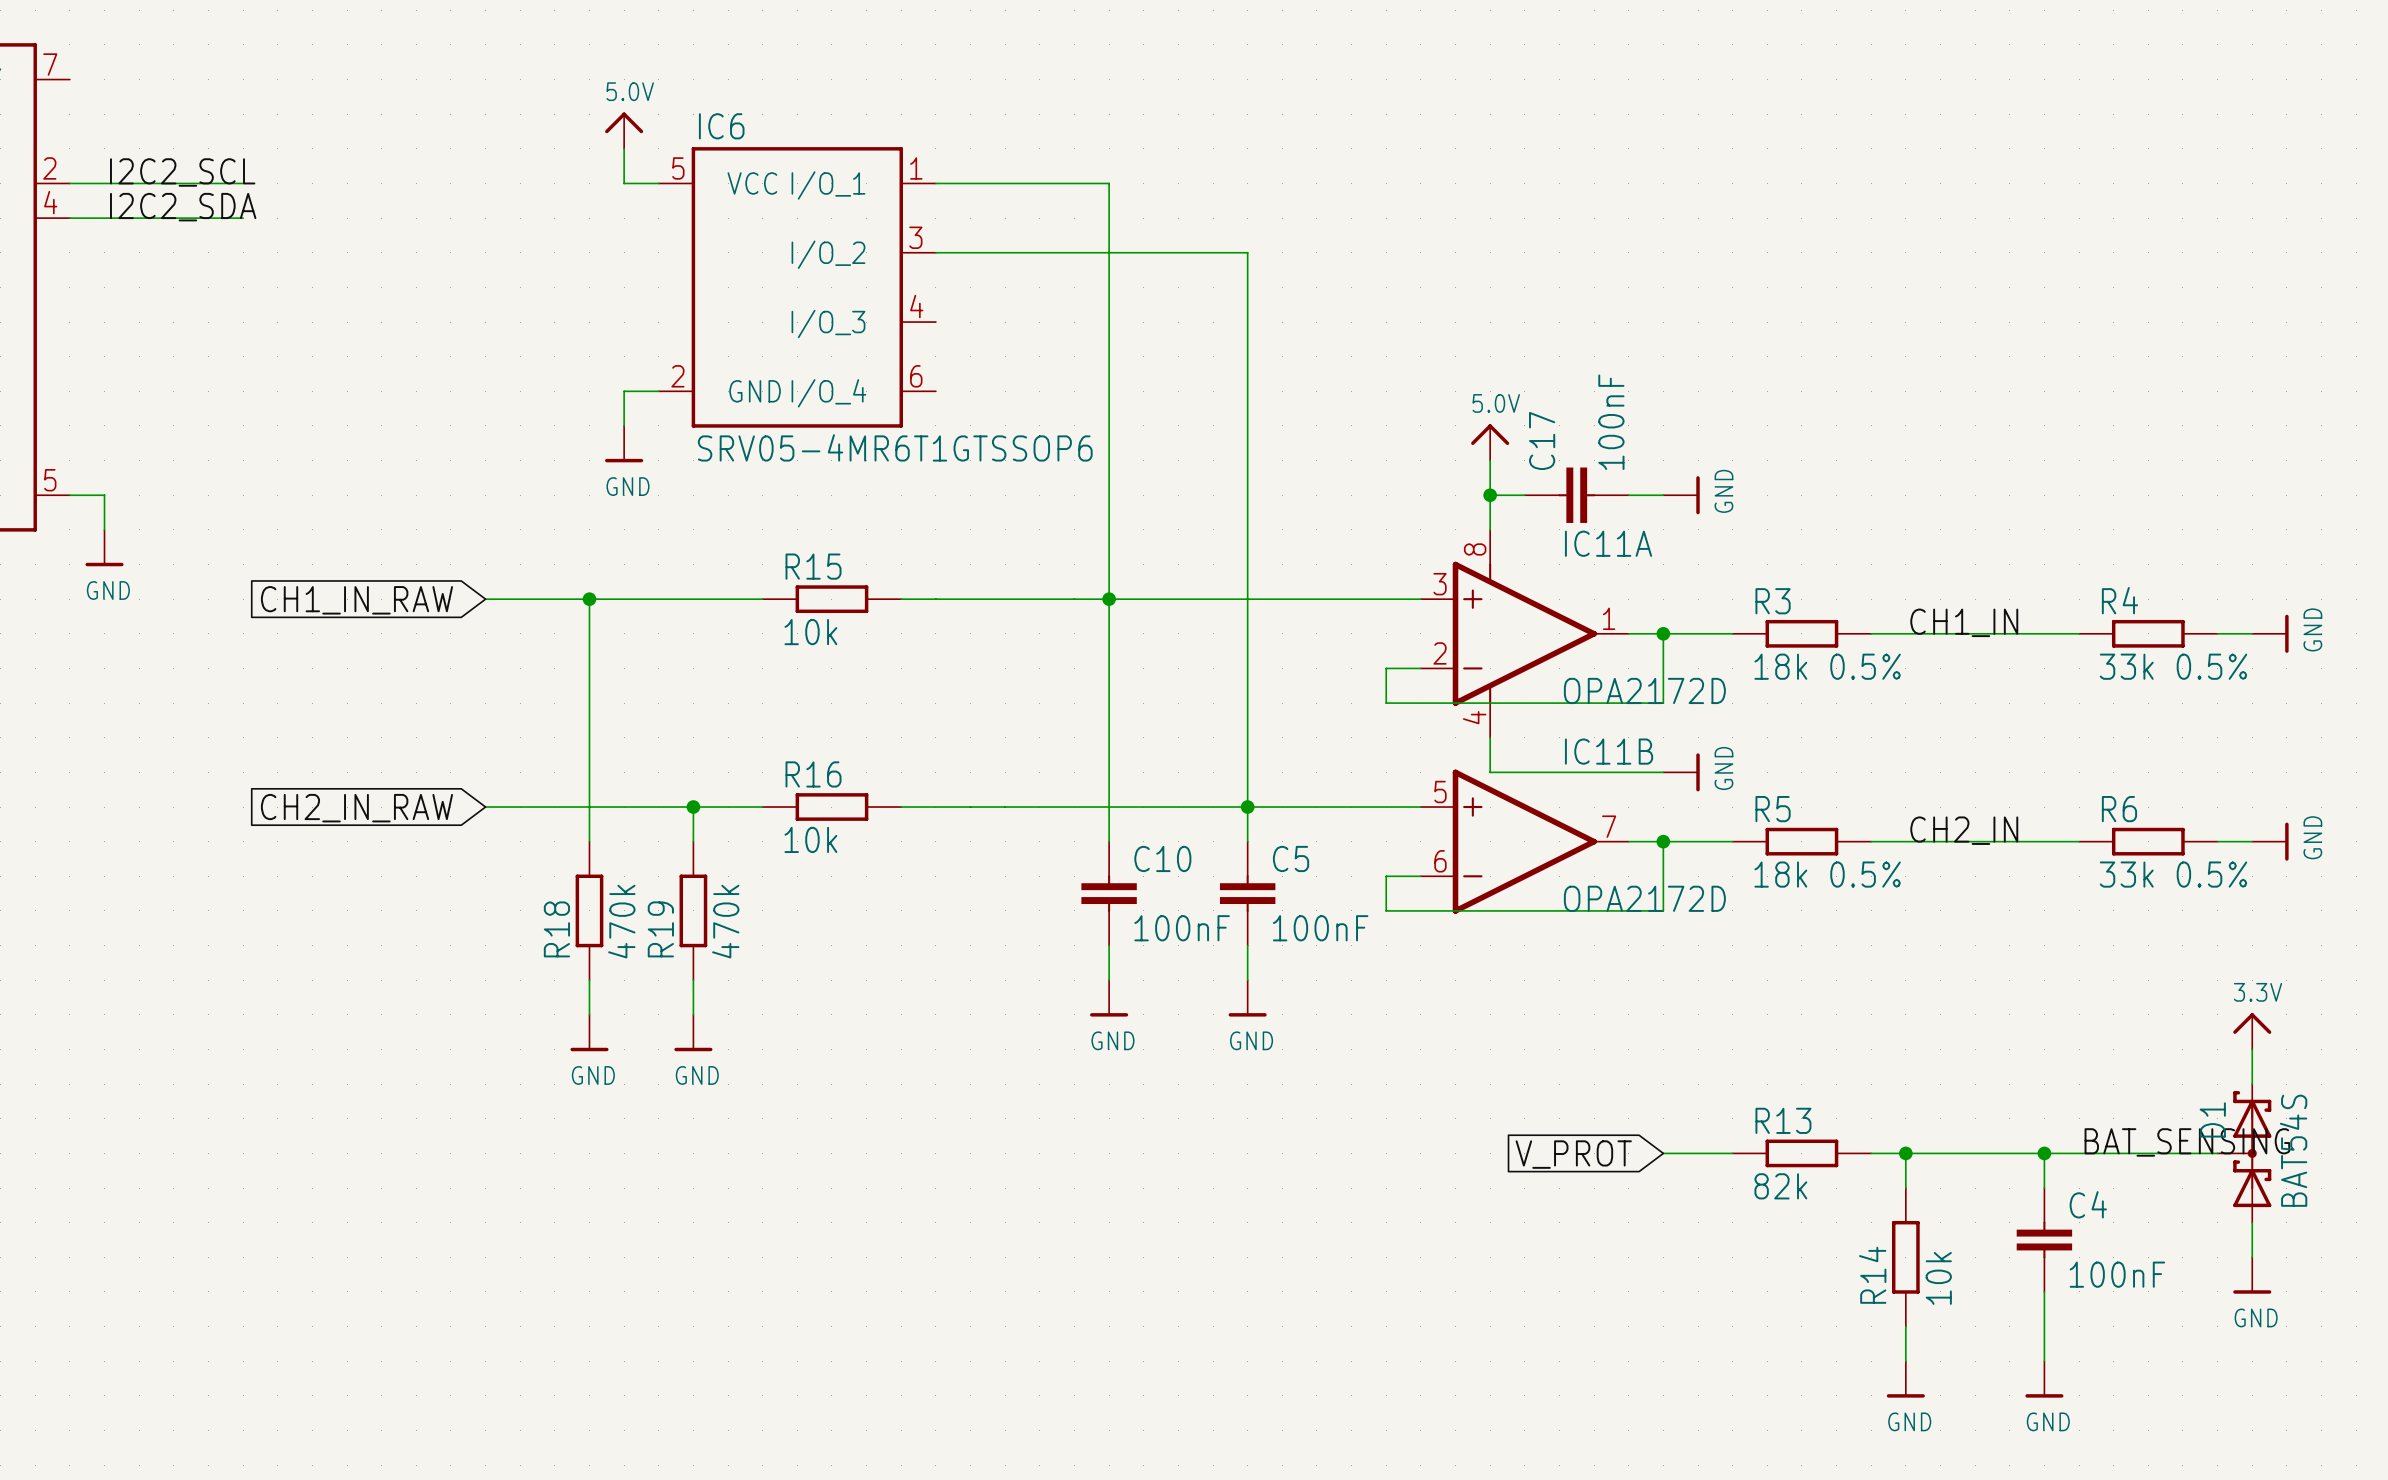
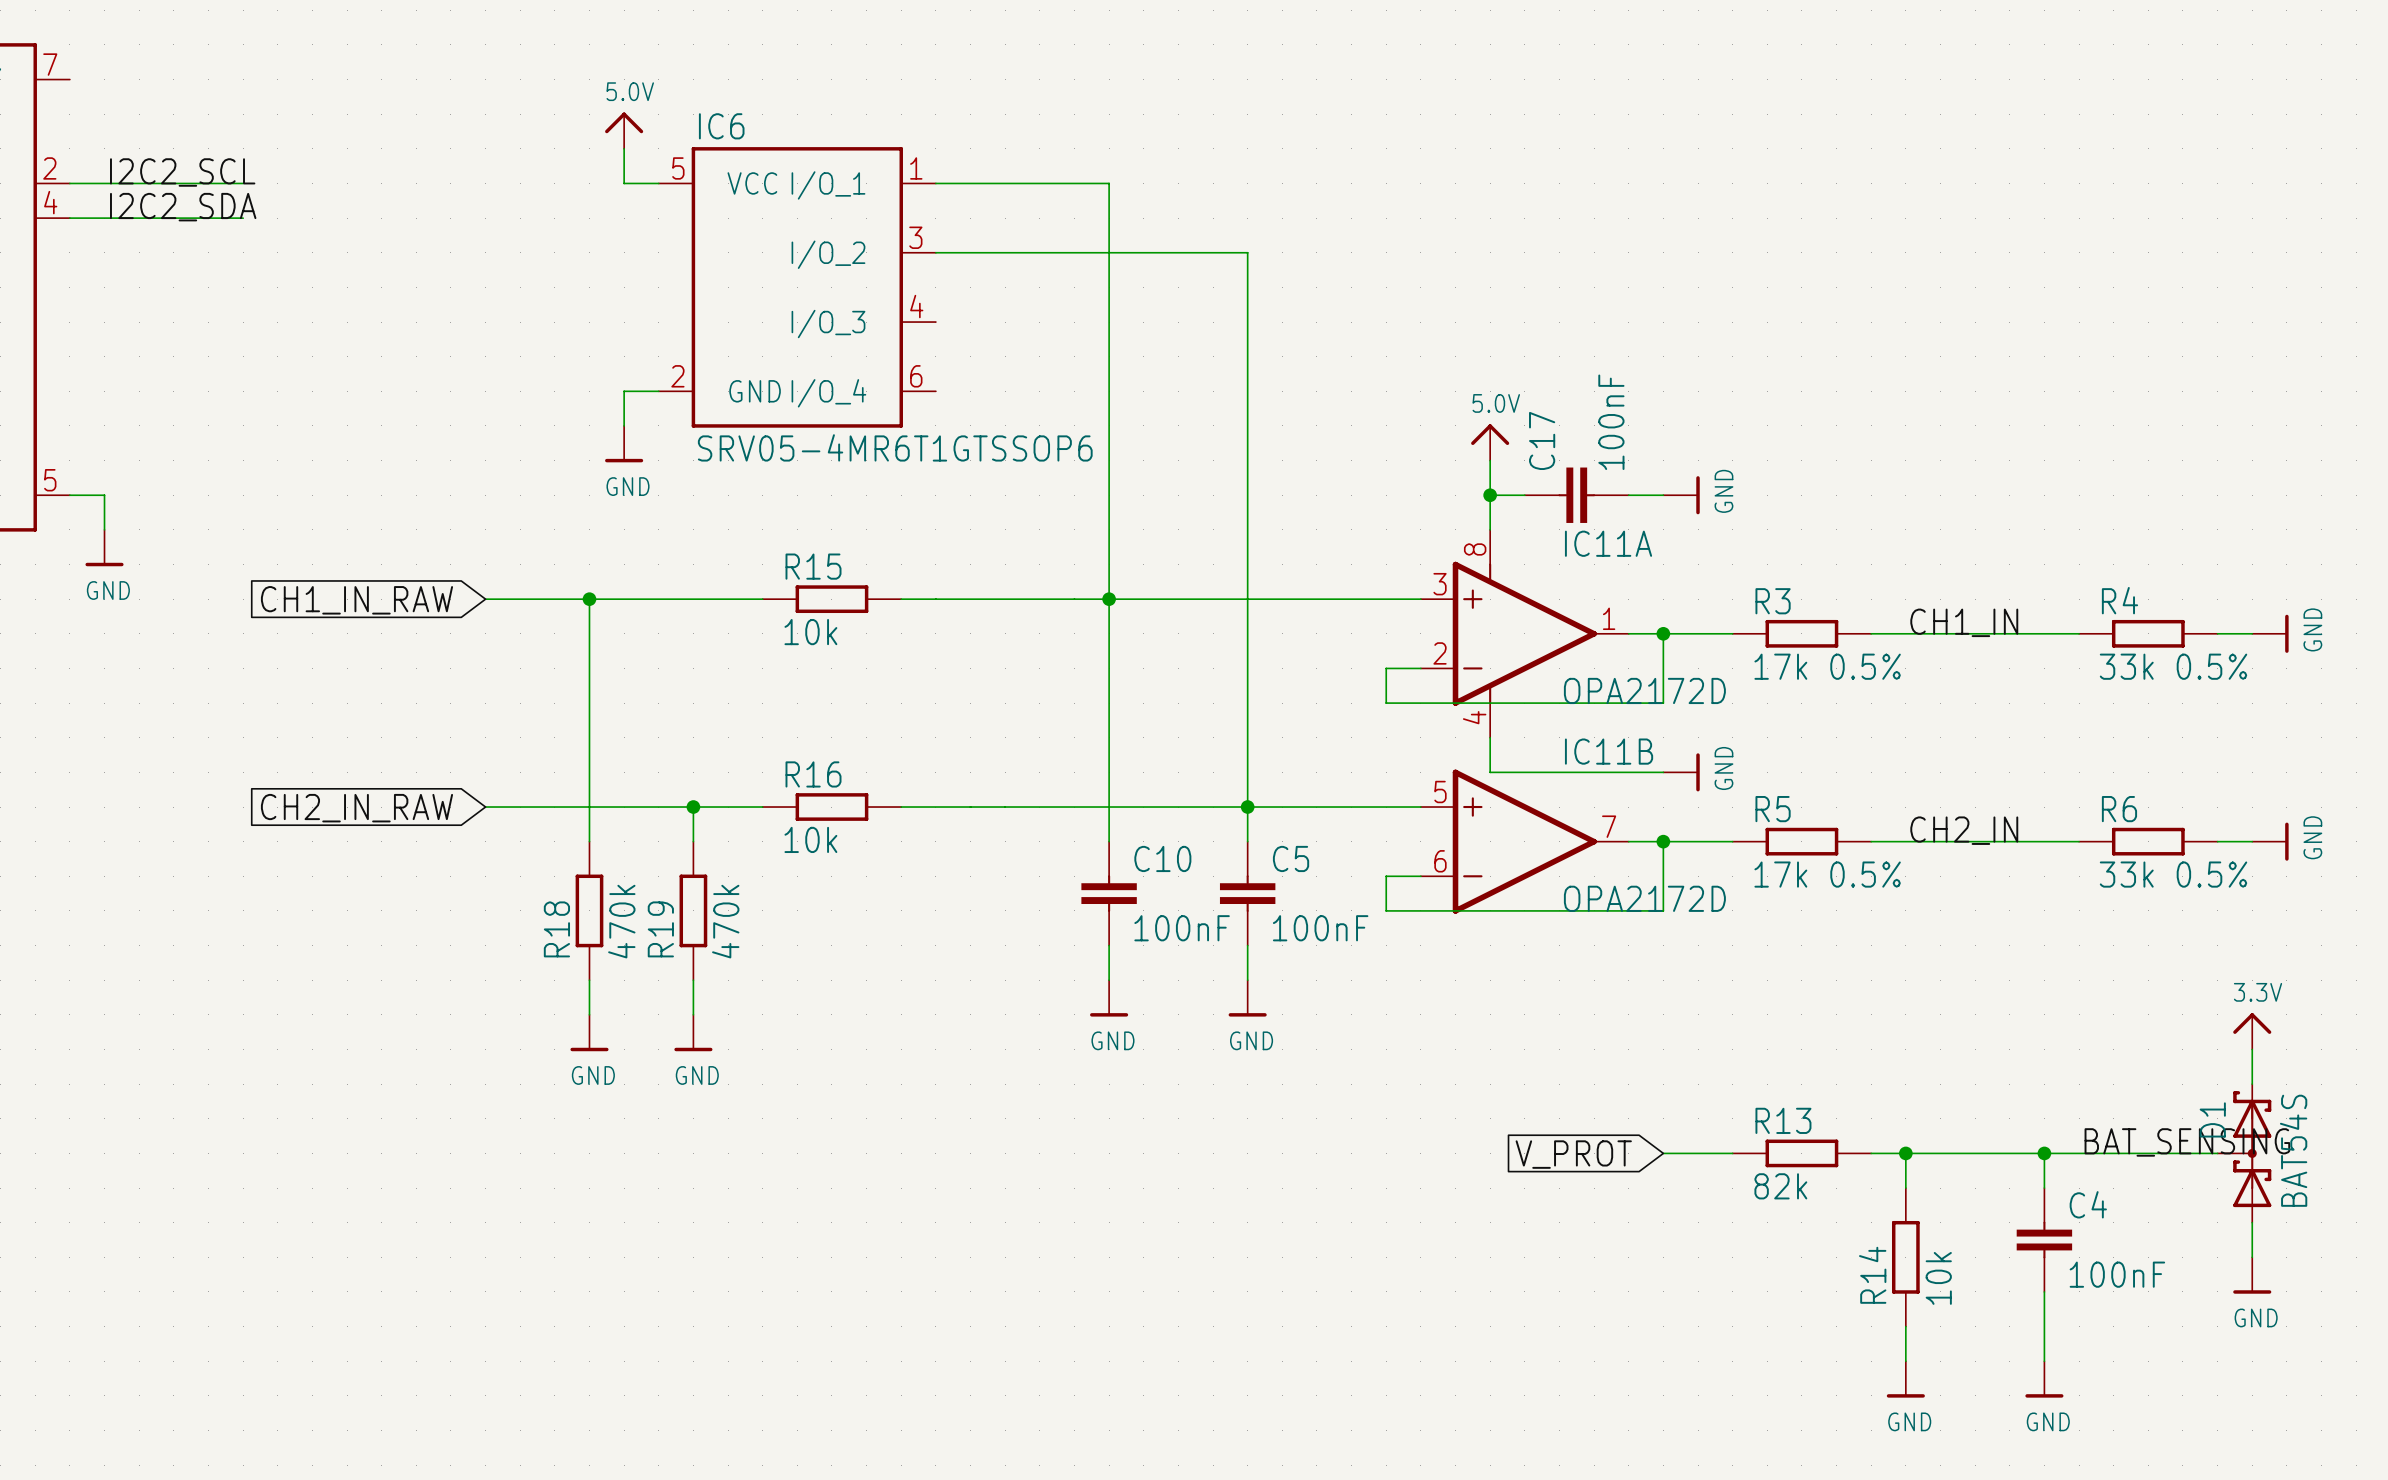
R3 value: 18k 0.5% (1827, 666) -> 17k 0.5% (1827, 666)
R5 value: 18k 0.5% (1827, 874) -> 17k 0.5% (1827, 874)

